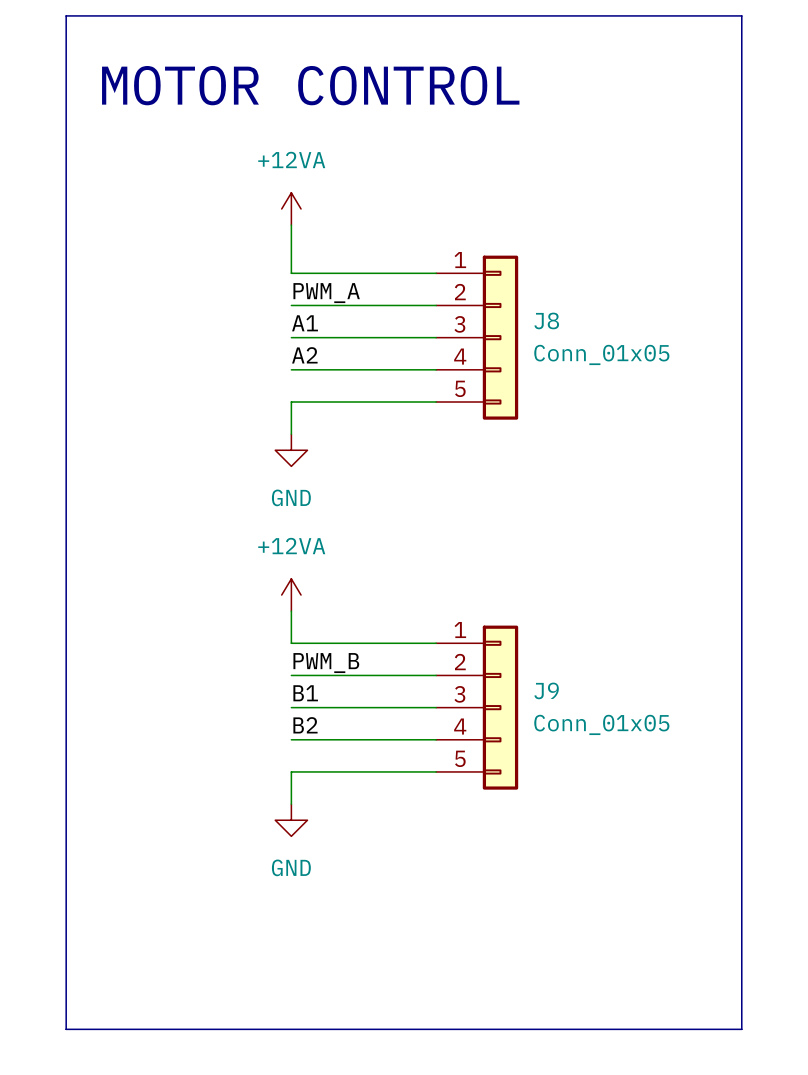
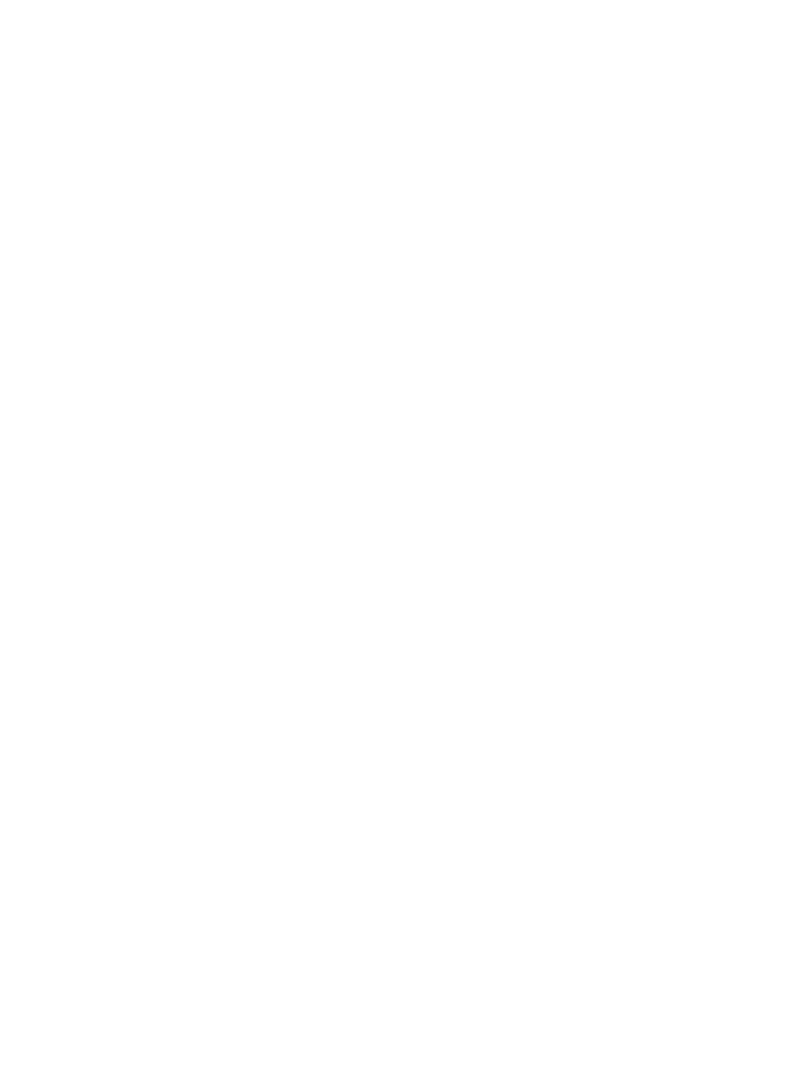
line: (66, 15) (741, 15) (741, 1029) (66, 1029) (66, 15) -> none
text: MOTOR CONTROL (310, 85) -> none
power symbol: +12VA (291, 208) -> none
wire: (291, 225) (291, 273) (436, 273) -> none
label: PWM_A (326, 293) -> none
wire: (291, 305) (436, 305) -> none
label: A1 (305, 323) -> none
wire: (291, 337) (436, 337) -> none
J8: Conn_01x05 (477, 337) -> none
label: A2 (304, 355) -> none
wire: (291, 369) (436, 369) -> none
wire: (436, 402) (291, 402) (291, 434) -> none
power symbol: GND (291, 450) -> none
power symbol: +12VA (291, 595) -> none
wire: (291, 611) (291, 643) (436, 643) -> none
label: PWM_B (326, 663) -> none
wire: (291, 675) (436, 675) -> none
label: B1 (305, 693) -> none
wire: (291, 707) (436, 707) -> none
J9: Conn_01x05 (477, 707) -> none
label: B2 (305, 725) -> none
wire: (291, 739) (436, 739) -> none
wire: (436, 771) (291, 771) (291, 804) -> none
power symbol: GND (291, 820) -> none

